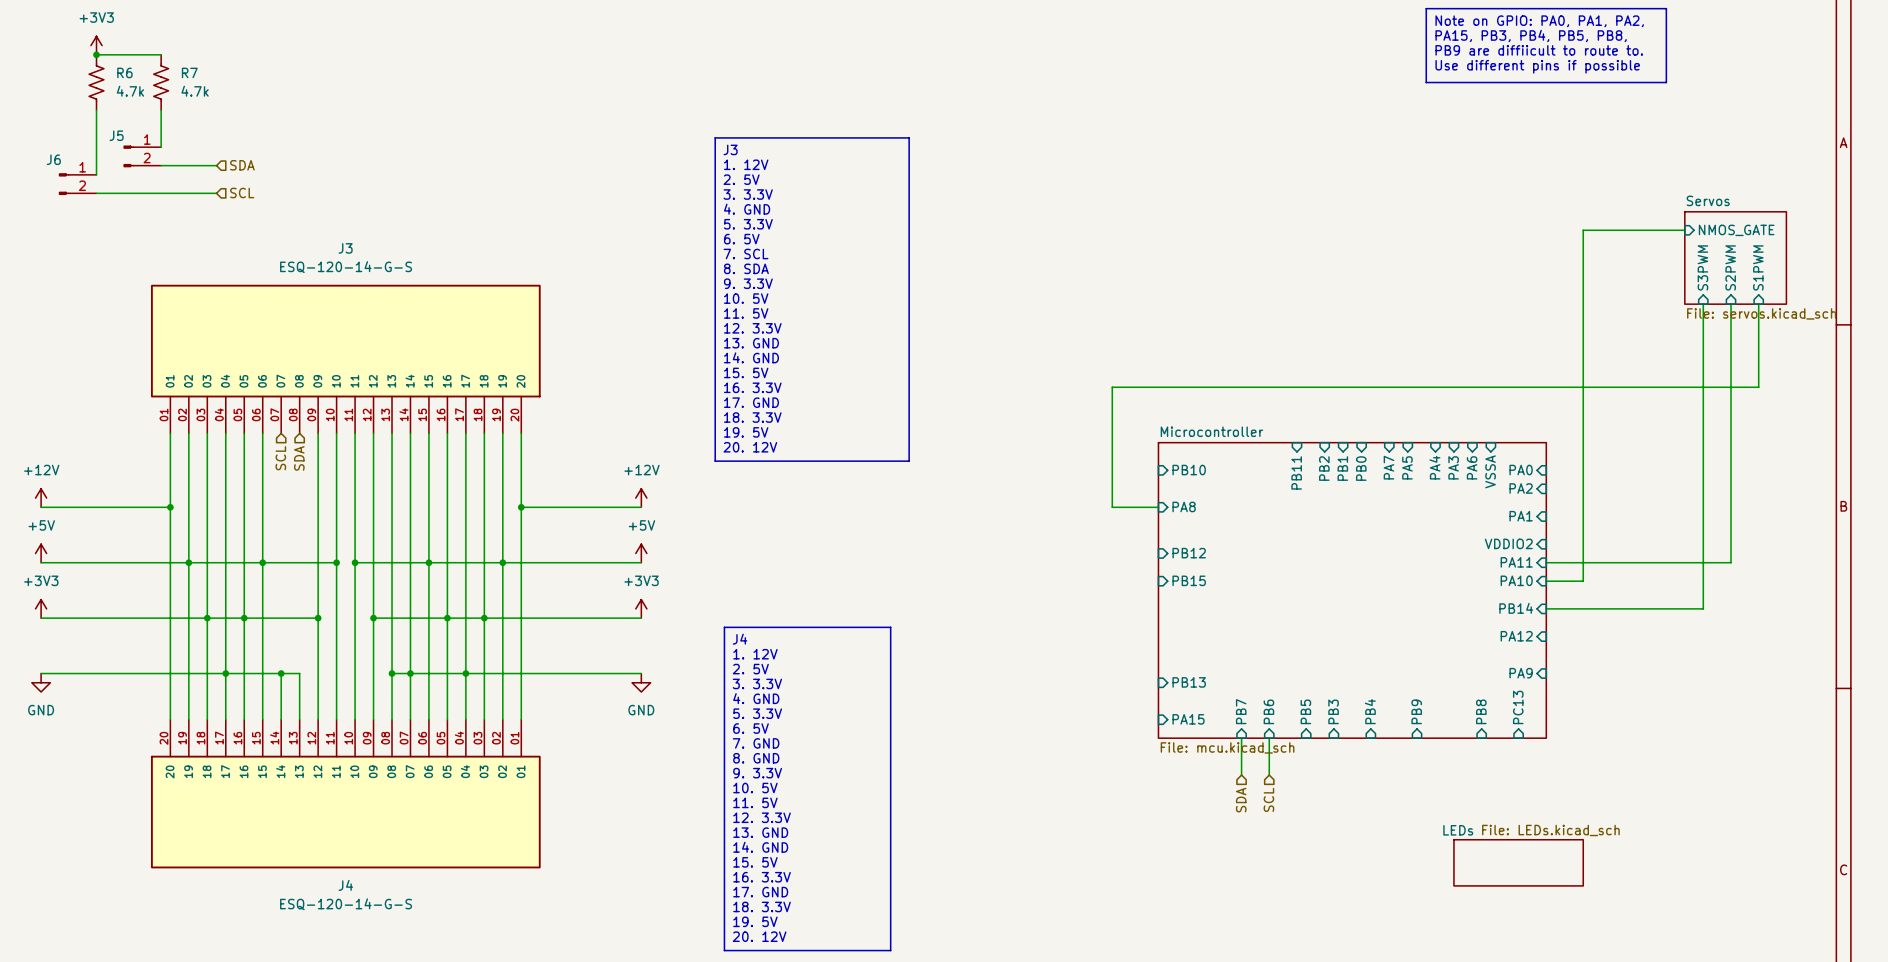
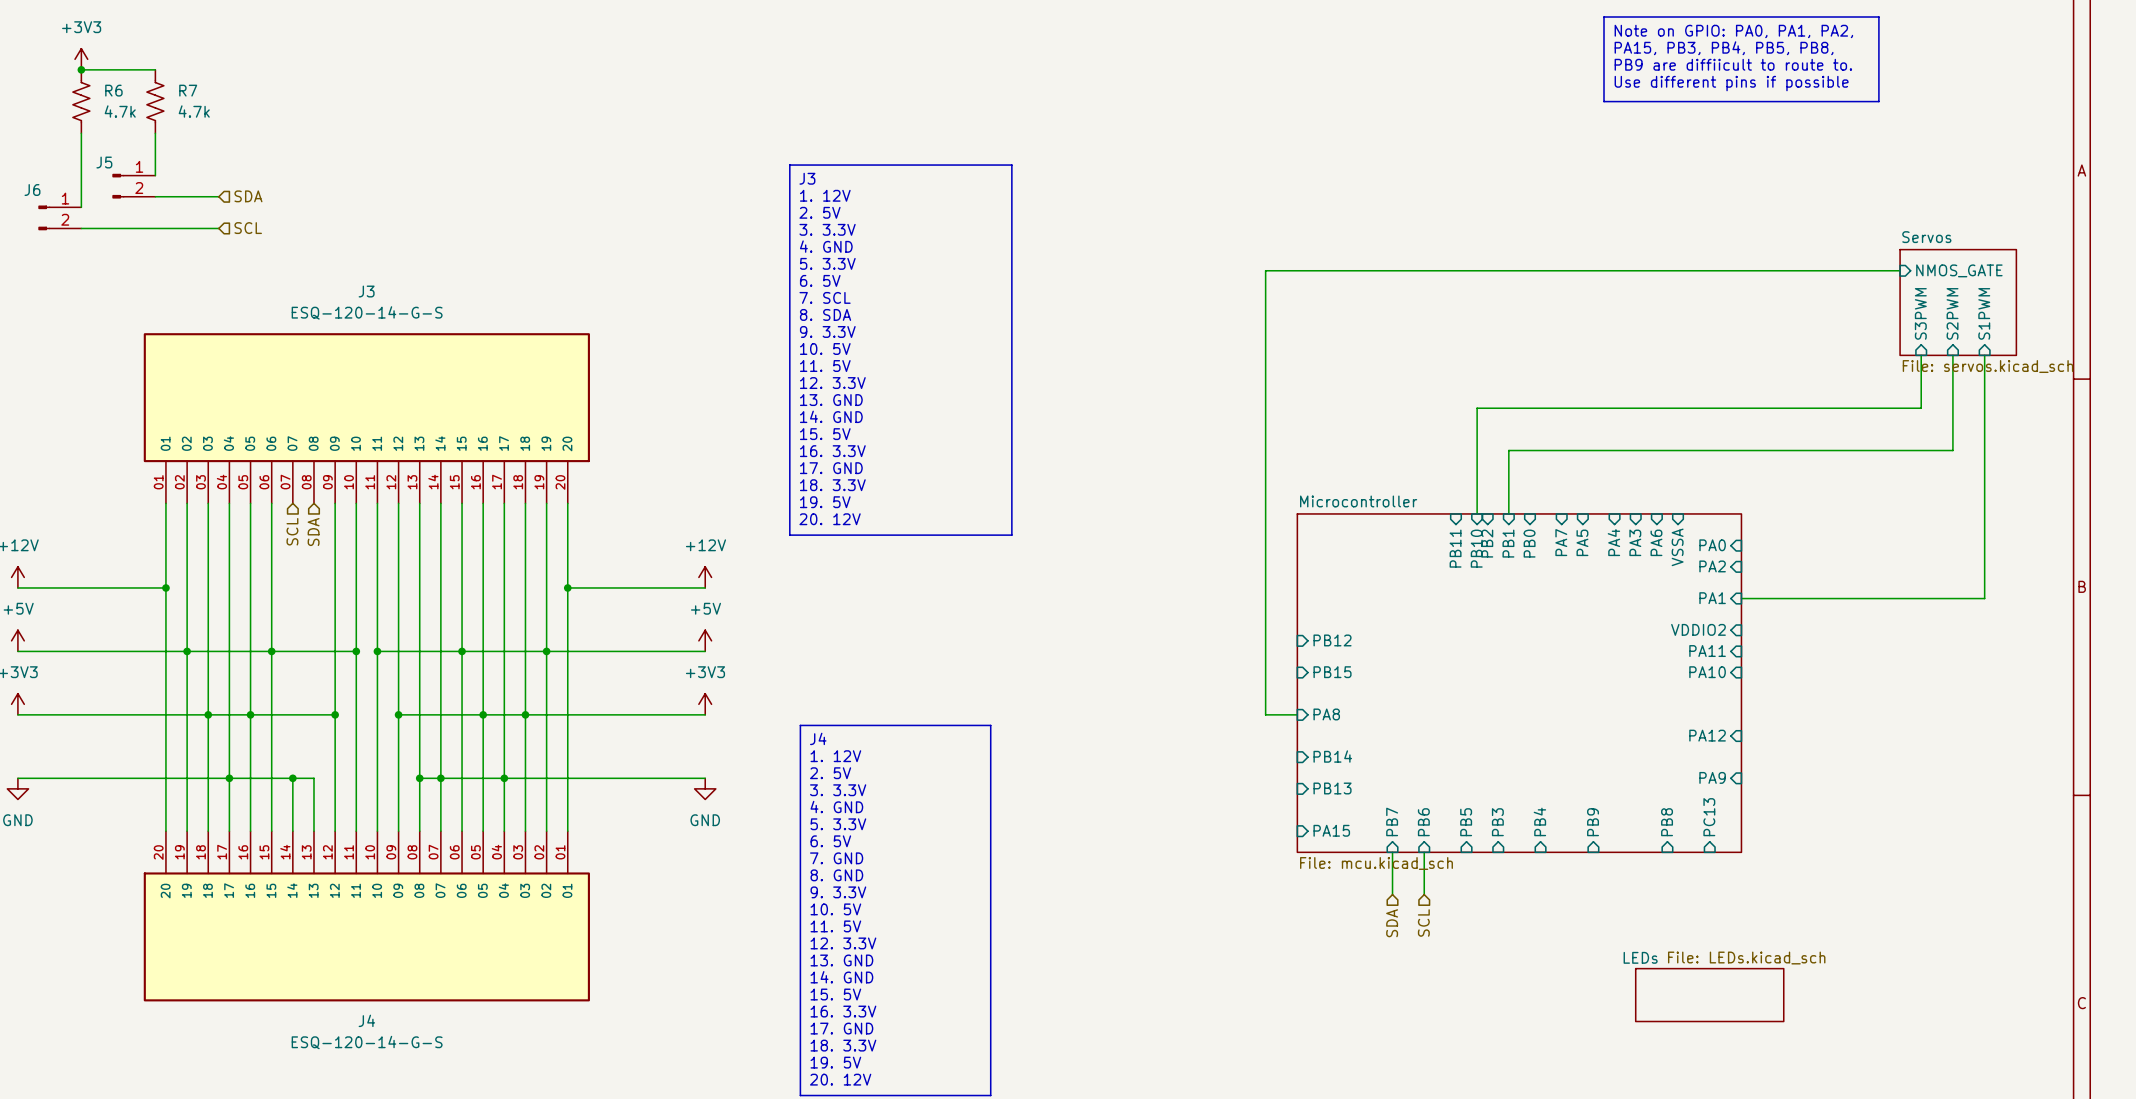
wire: (1583, 230) (1583, 581) (1546, 581) -> (1783, 270) (1265, 270) (1265, 714) (1297, 714)
wire: (1703, 350) (1703, 608) (1546, 608) -> (1921, 408) (1477, 408) (1477, 513)
wire: (1343, 387) (1112, 387) (1112, 507) (1158, 507) -> (1508, 450) (1508, 513)
wire: (1758, 387) (1730, 387) (1730, 562) (1546, 562) -> (1984, 450) (1984, 598) (1741, 598)
sheet pin rotation: 0° (1189, 470) -> 90° clockwise (1476, 548)
sheet pin position: PB10 (1189, 470) -> PB10 (1476, 548)
sheet pin position: PA8 (1184, 506) -> PA8 (1326, 714)
sheet pin: PB14 (1516, 608) -> none
sheet pin: none -> PB14 (1332, 756)

